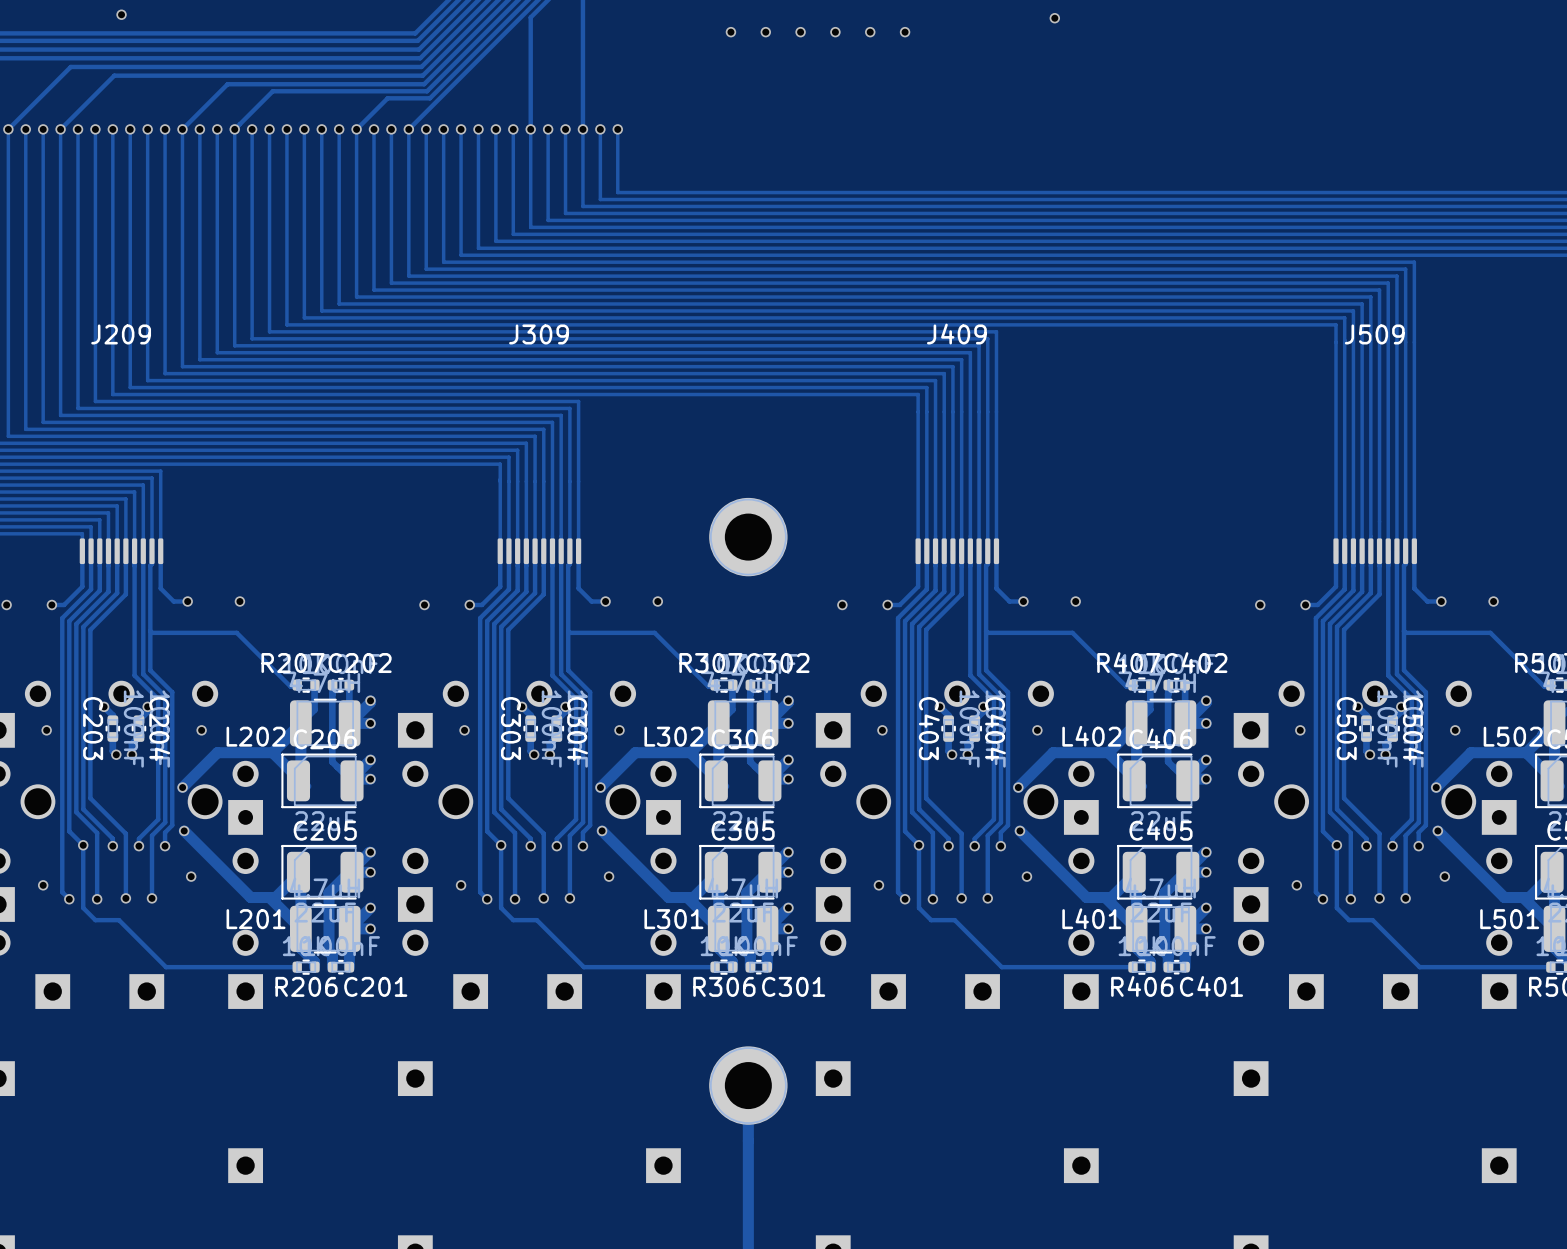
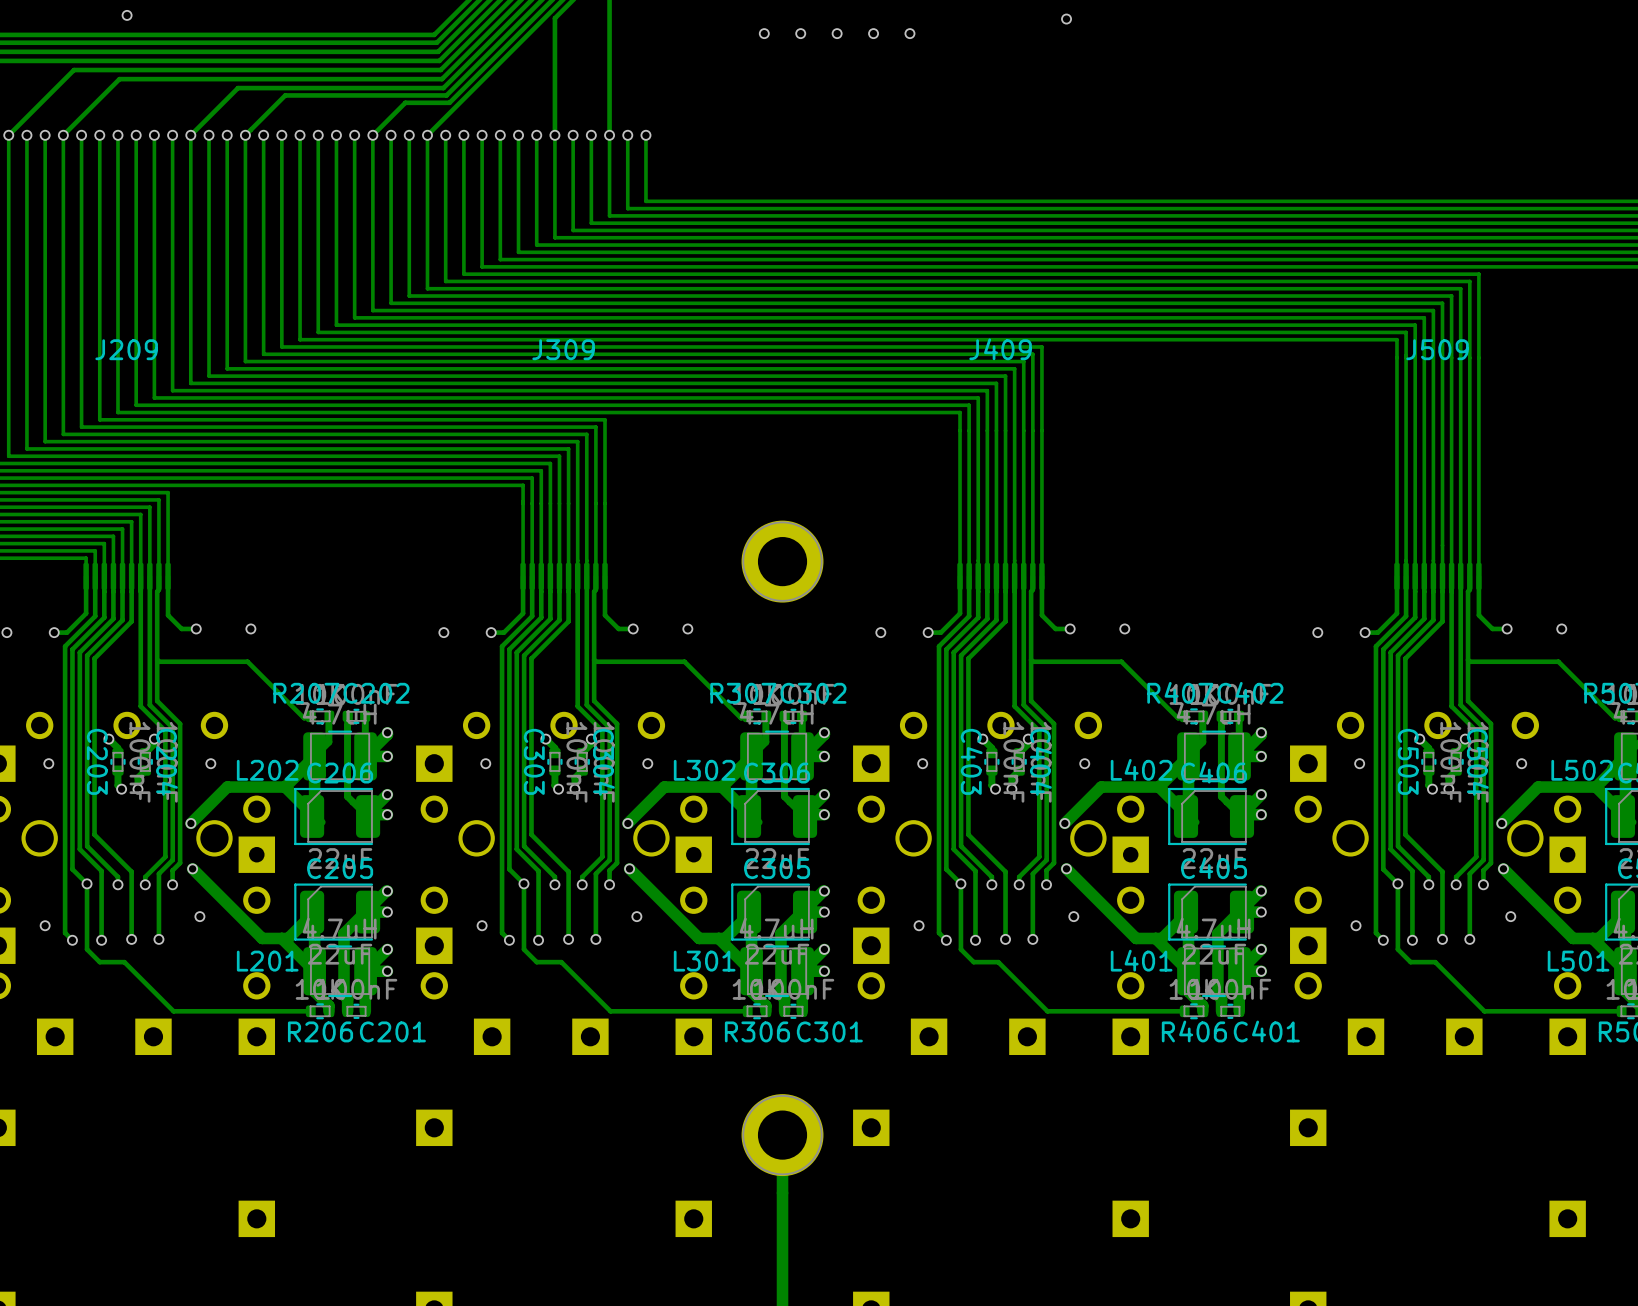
via position: (1054, 18) -> (1066, 19)
via: (905, 32) -> none

